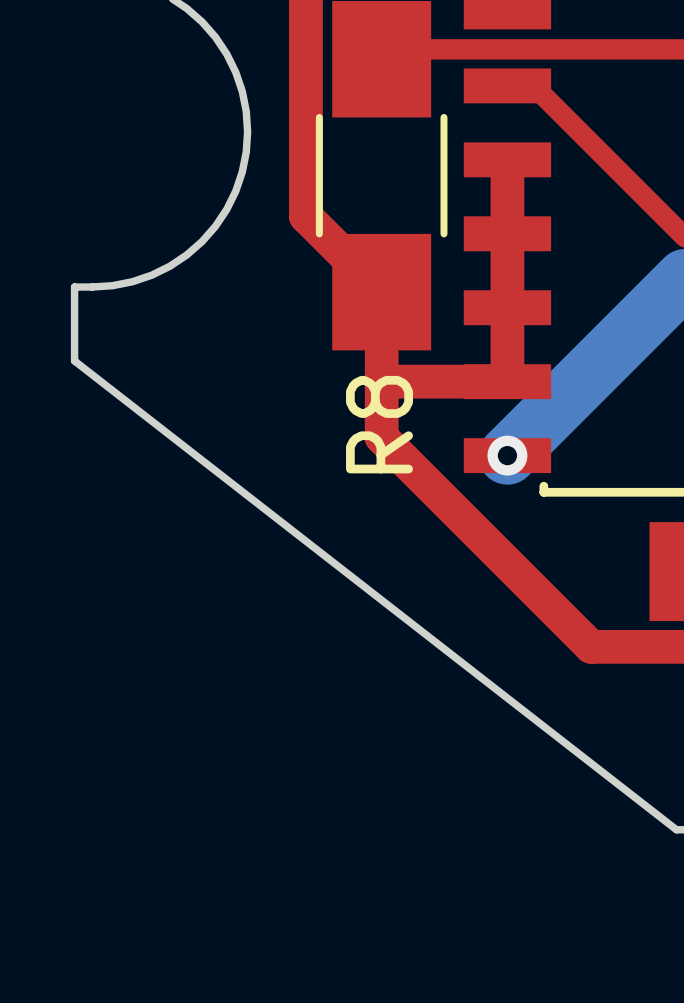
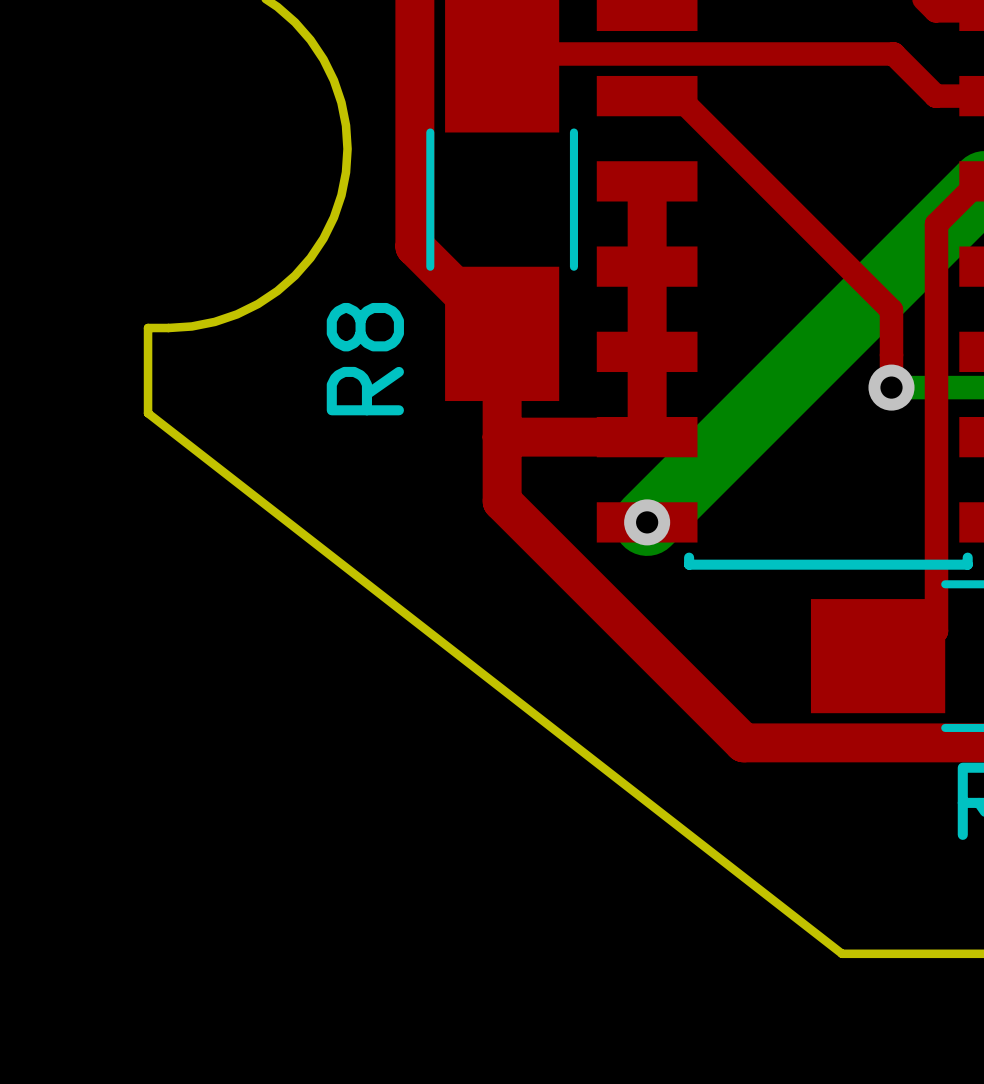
R8 name position: R8 (379, 424) -> R8 (365, 359)

